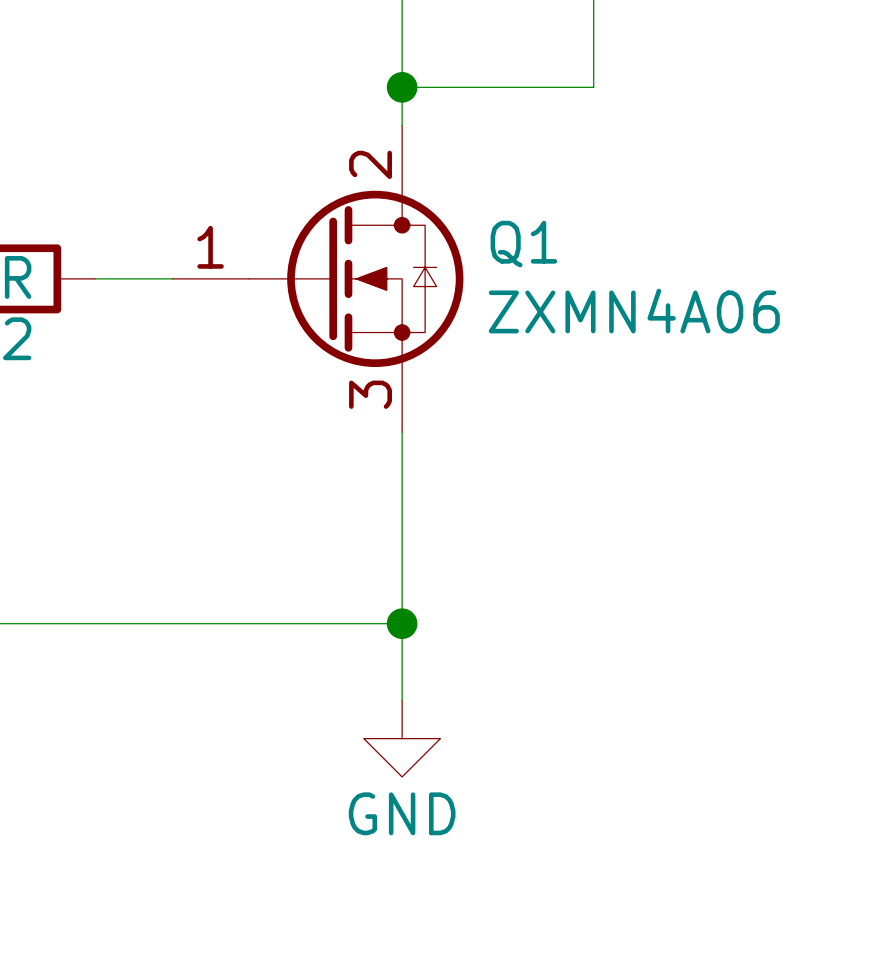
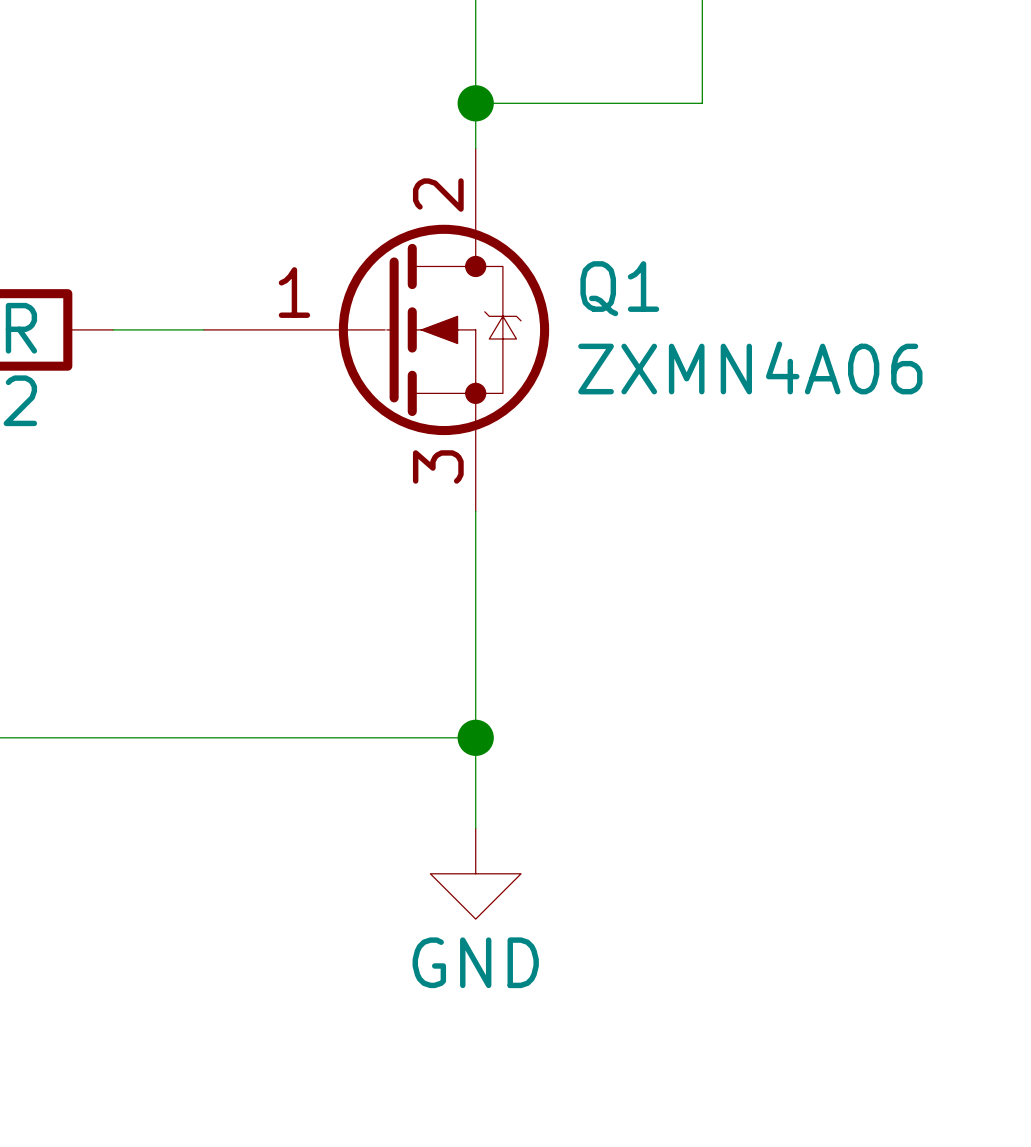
Q1 symbol: [172, 125, 464, 433] -> [203, 148, 550, 512]

